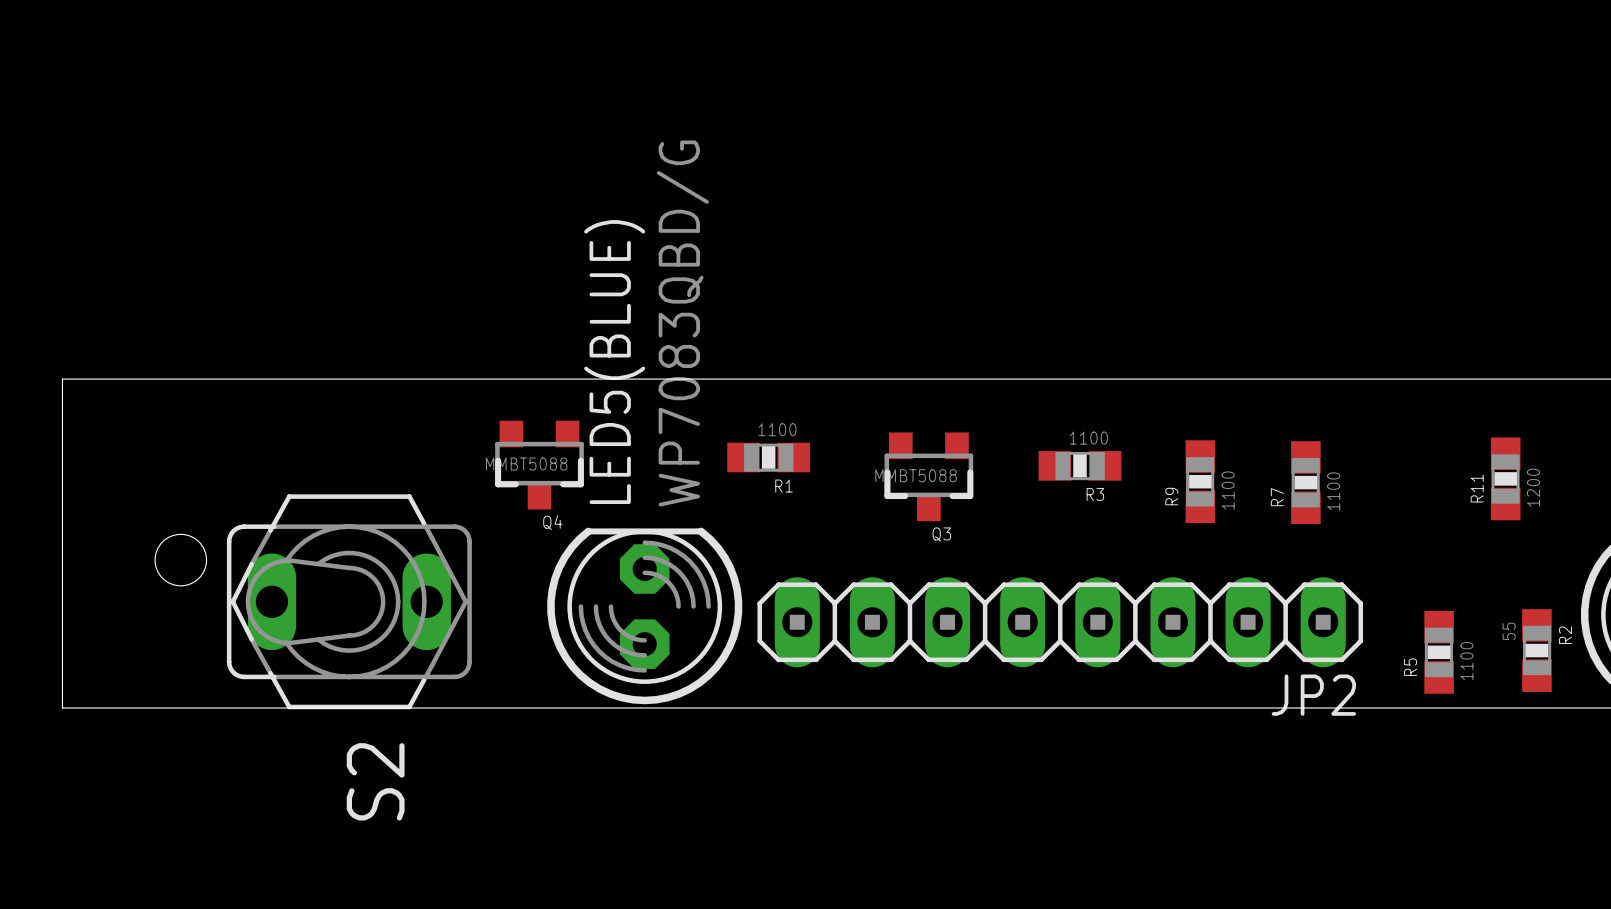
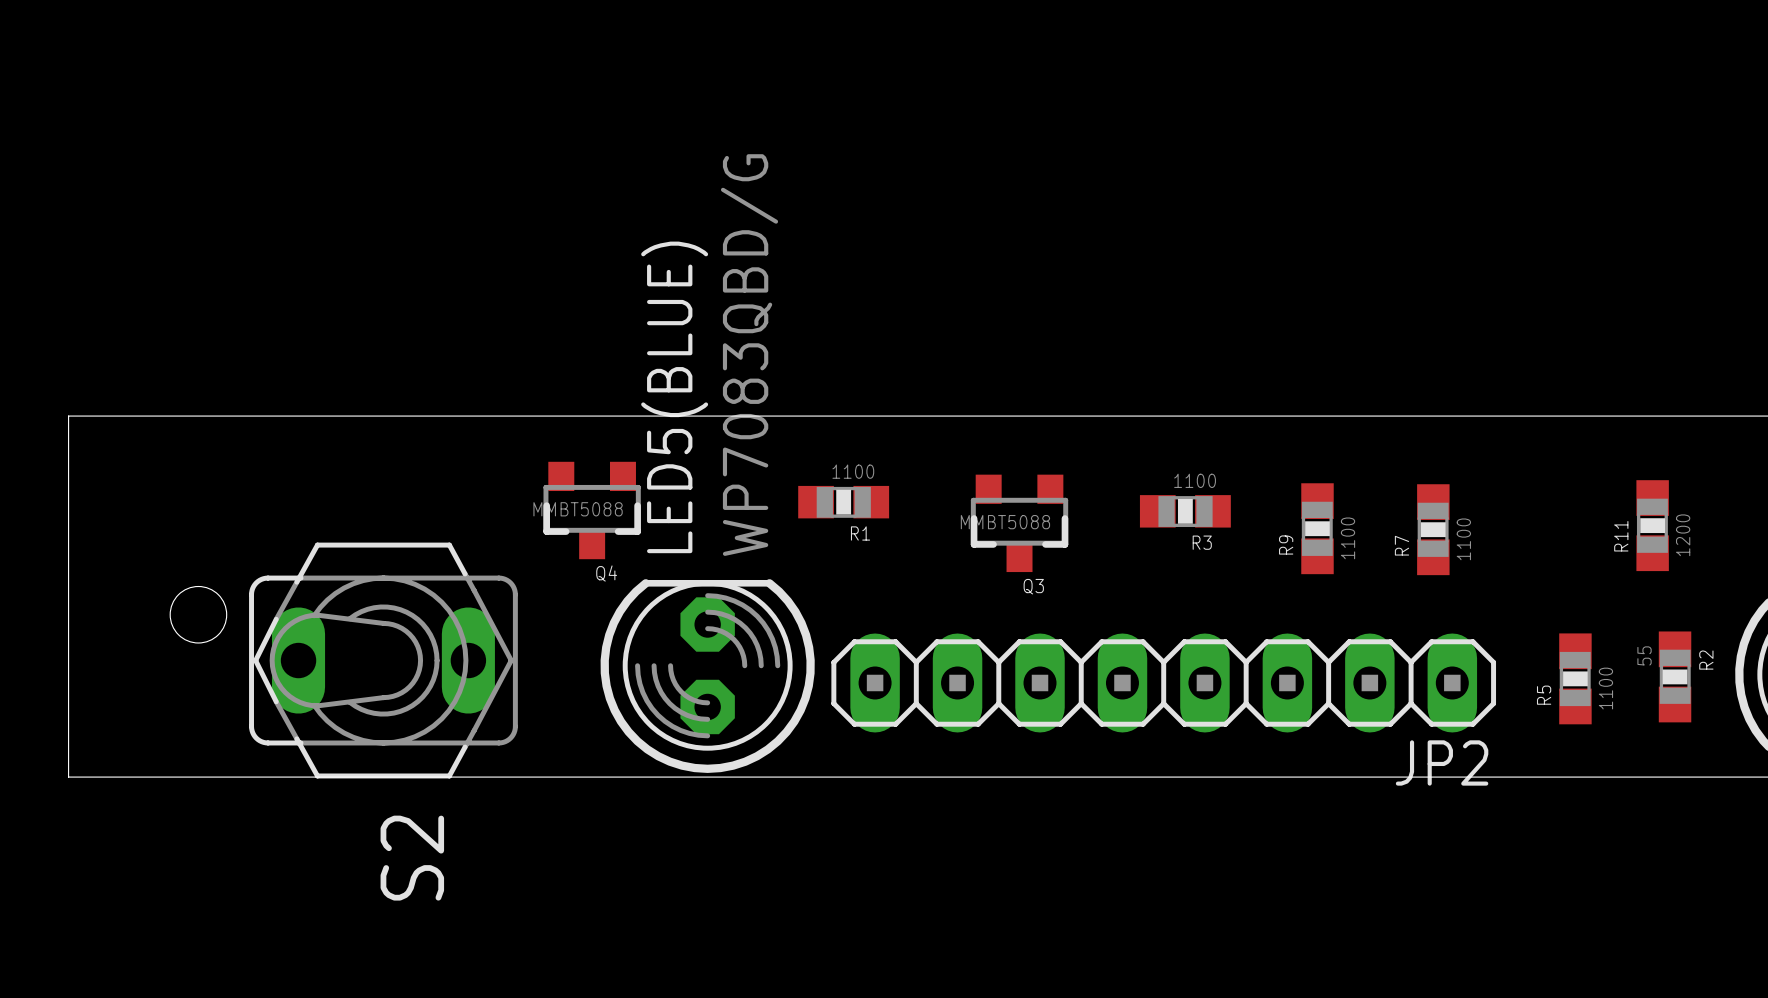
R2 position: (1536, 650) -> (1675, 676)
R5 position: (1439, 652) -> (1575, 678)

